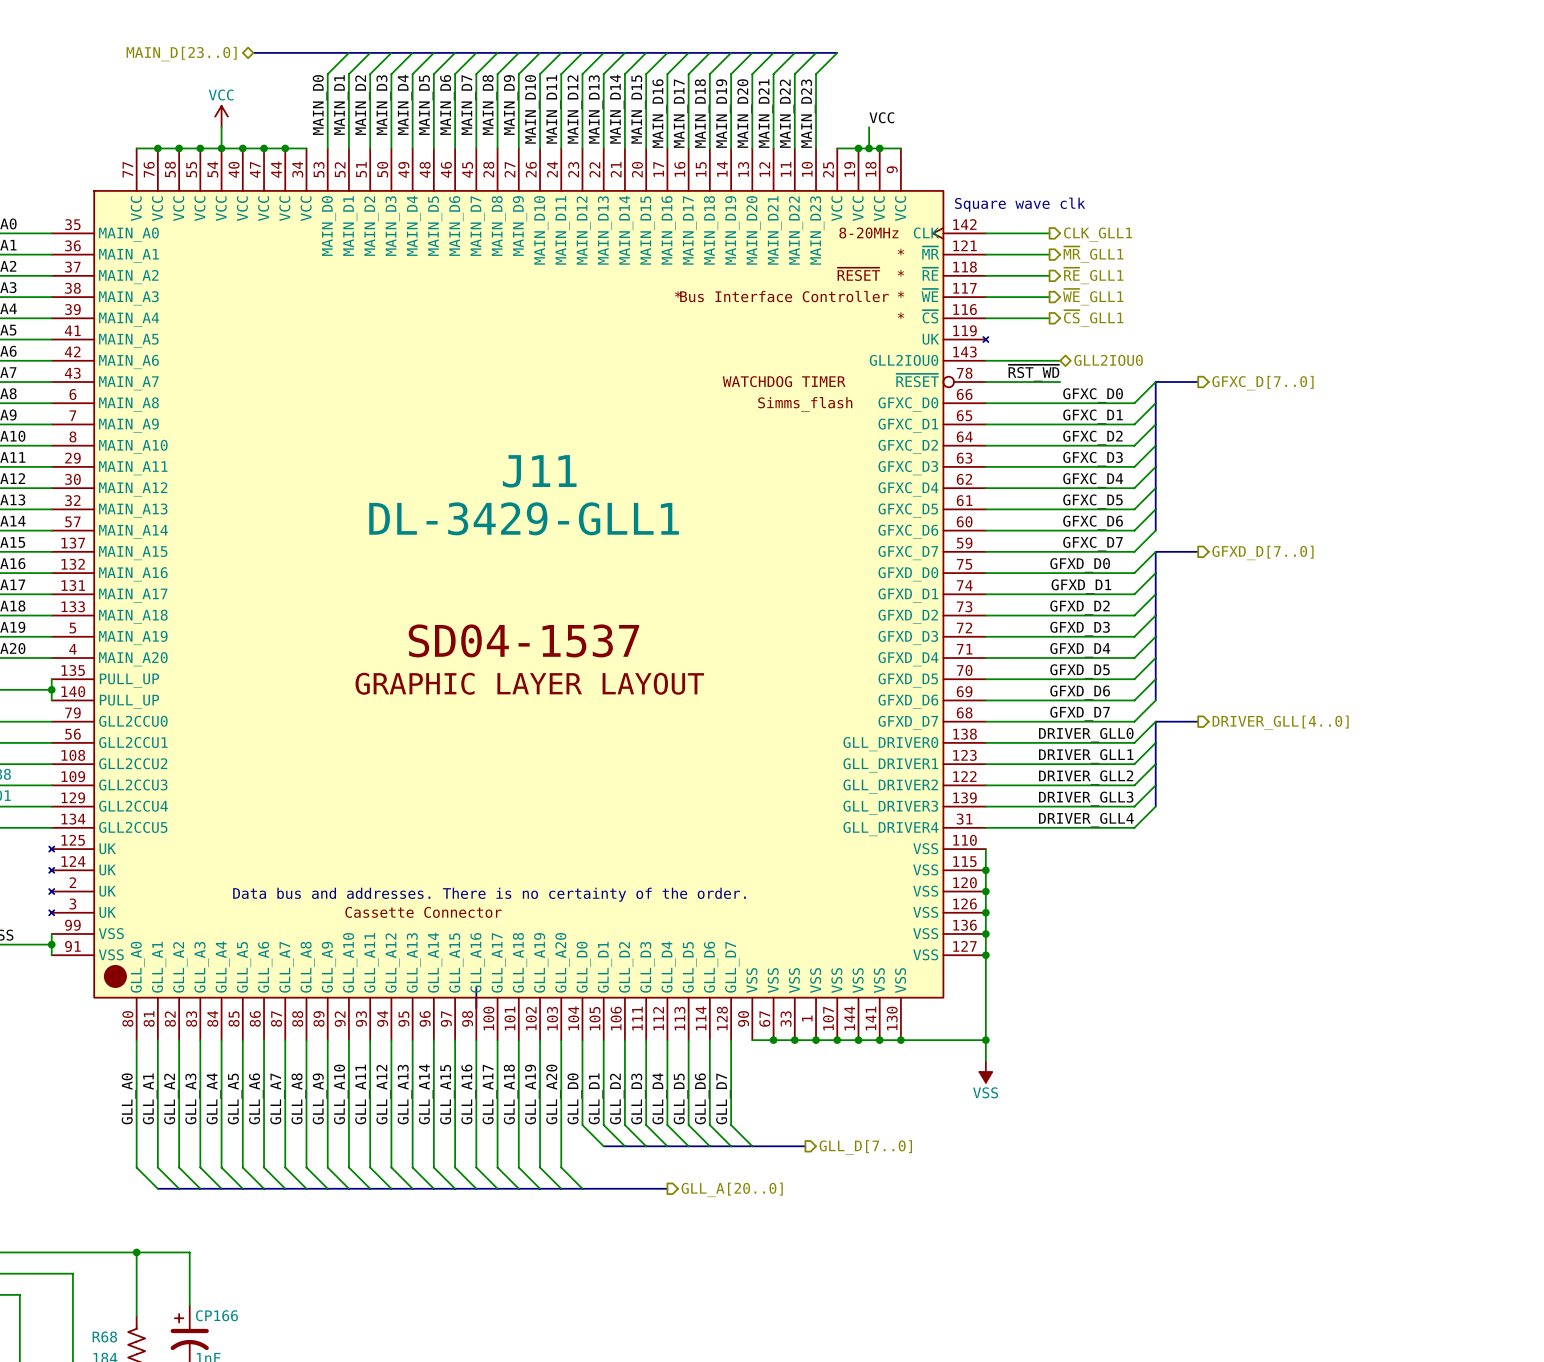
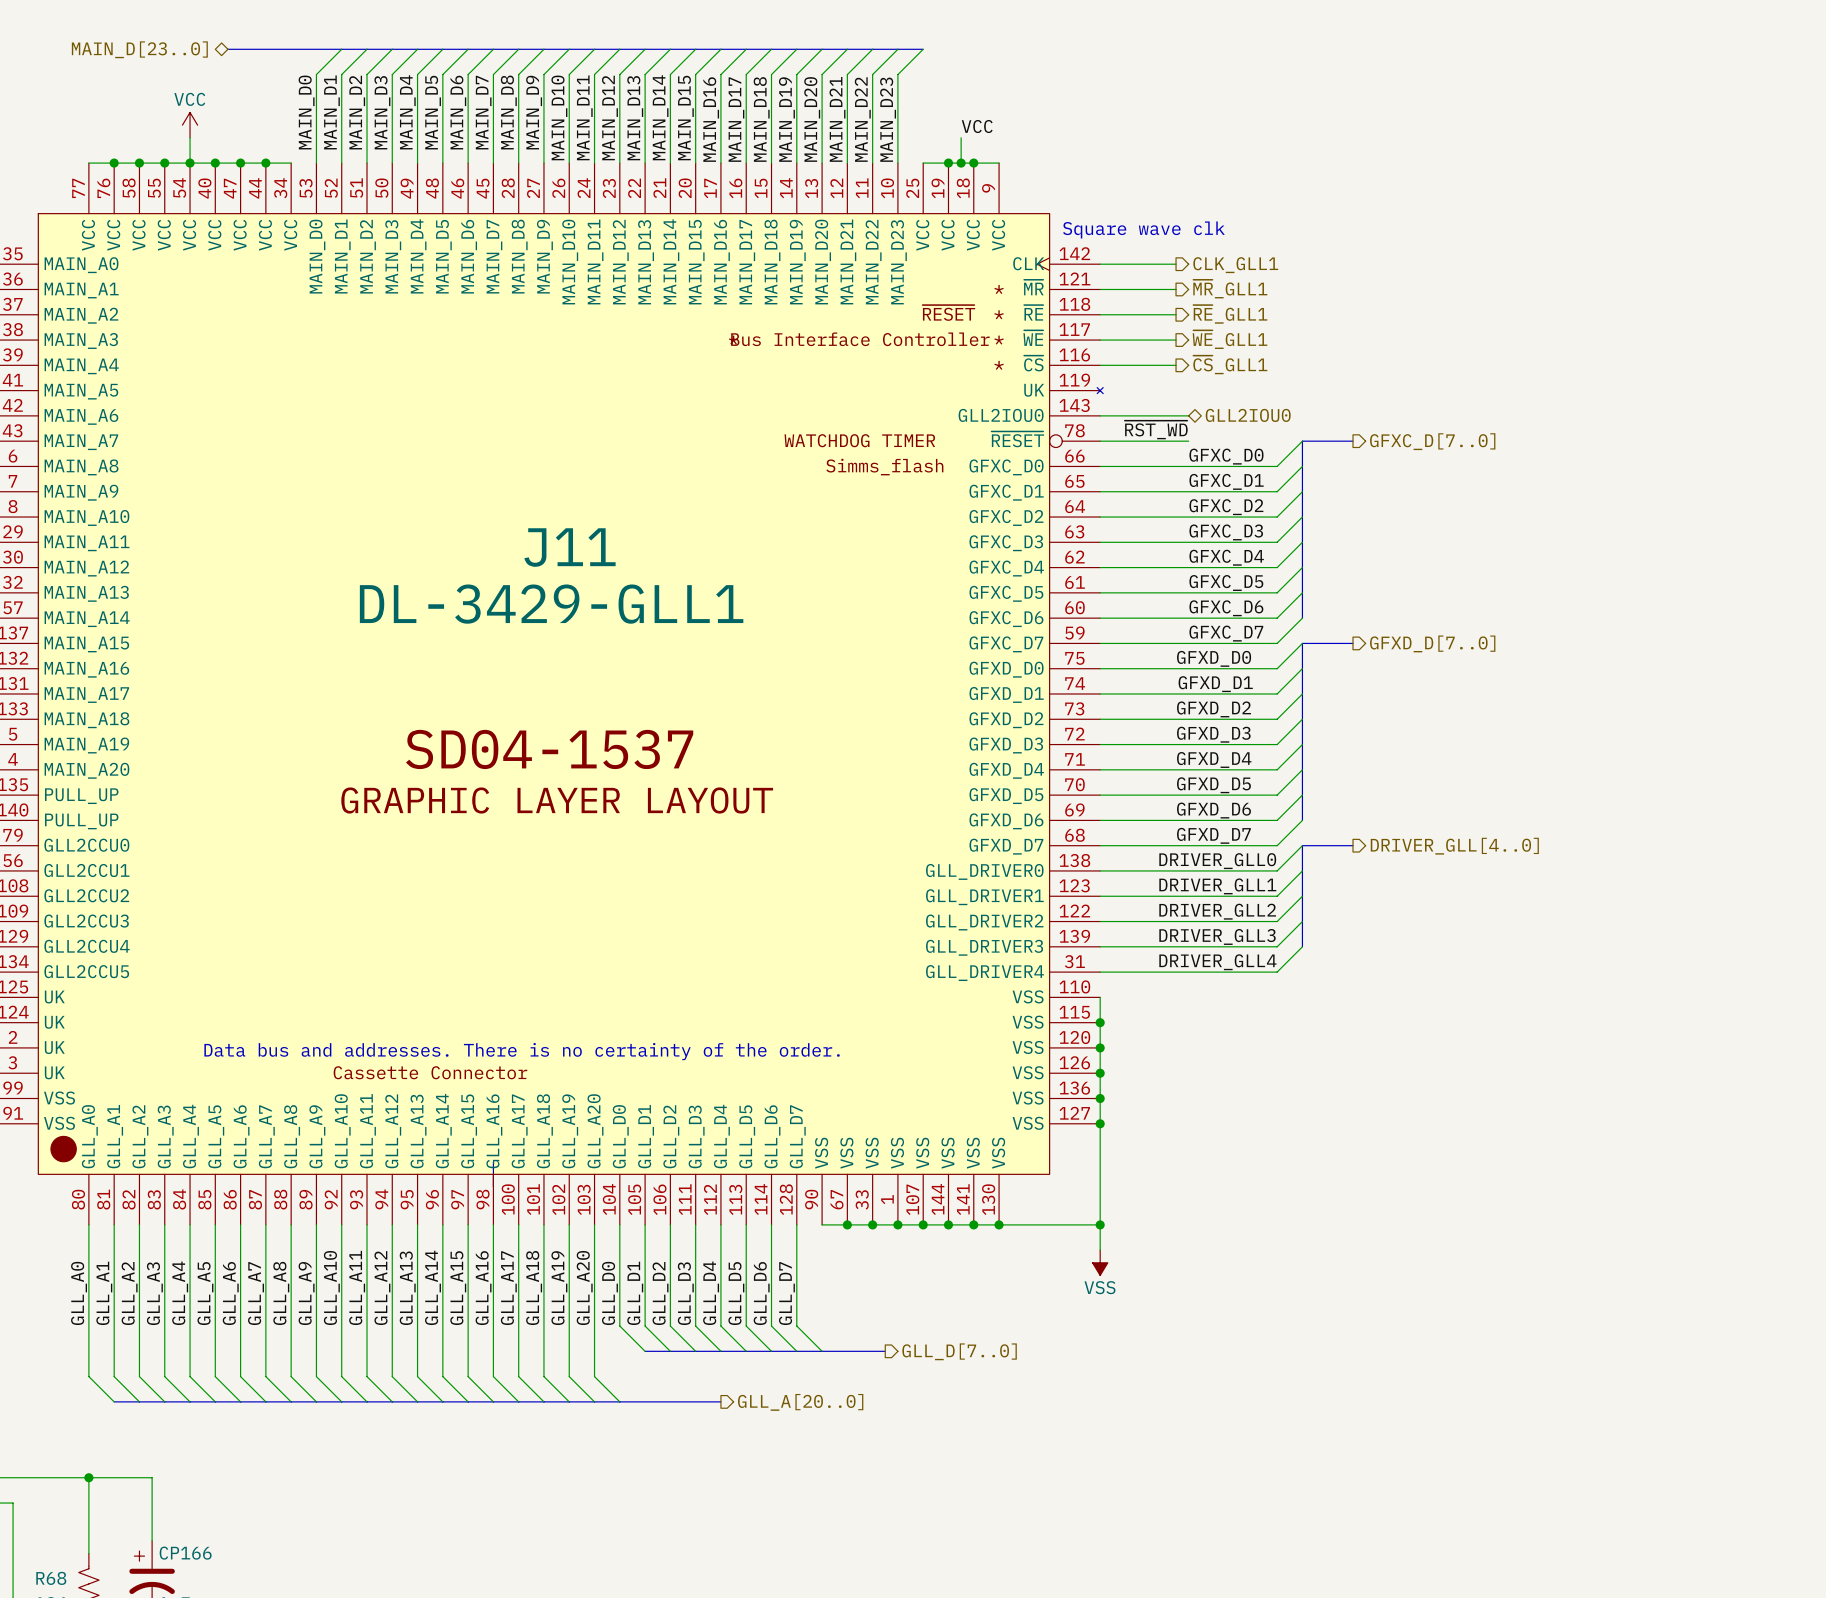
J11 text: 8-20MHz (868, 233) -> none

